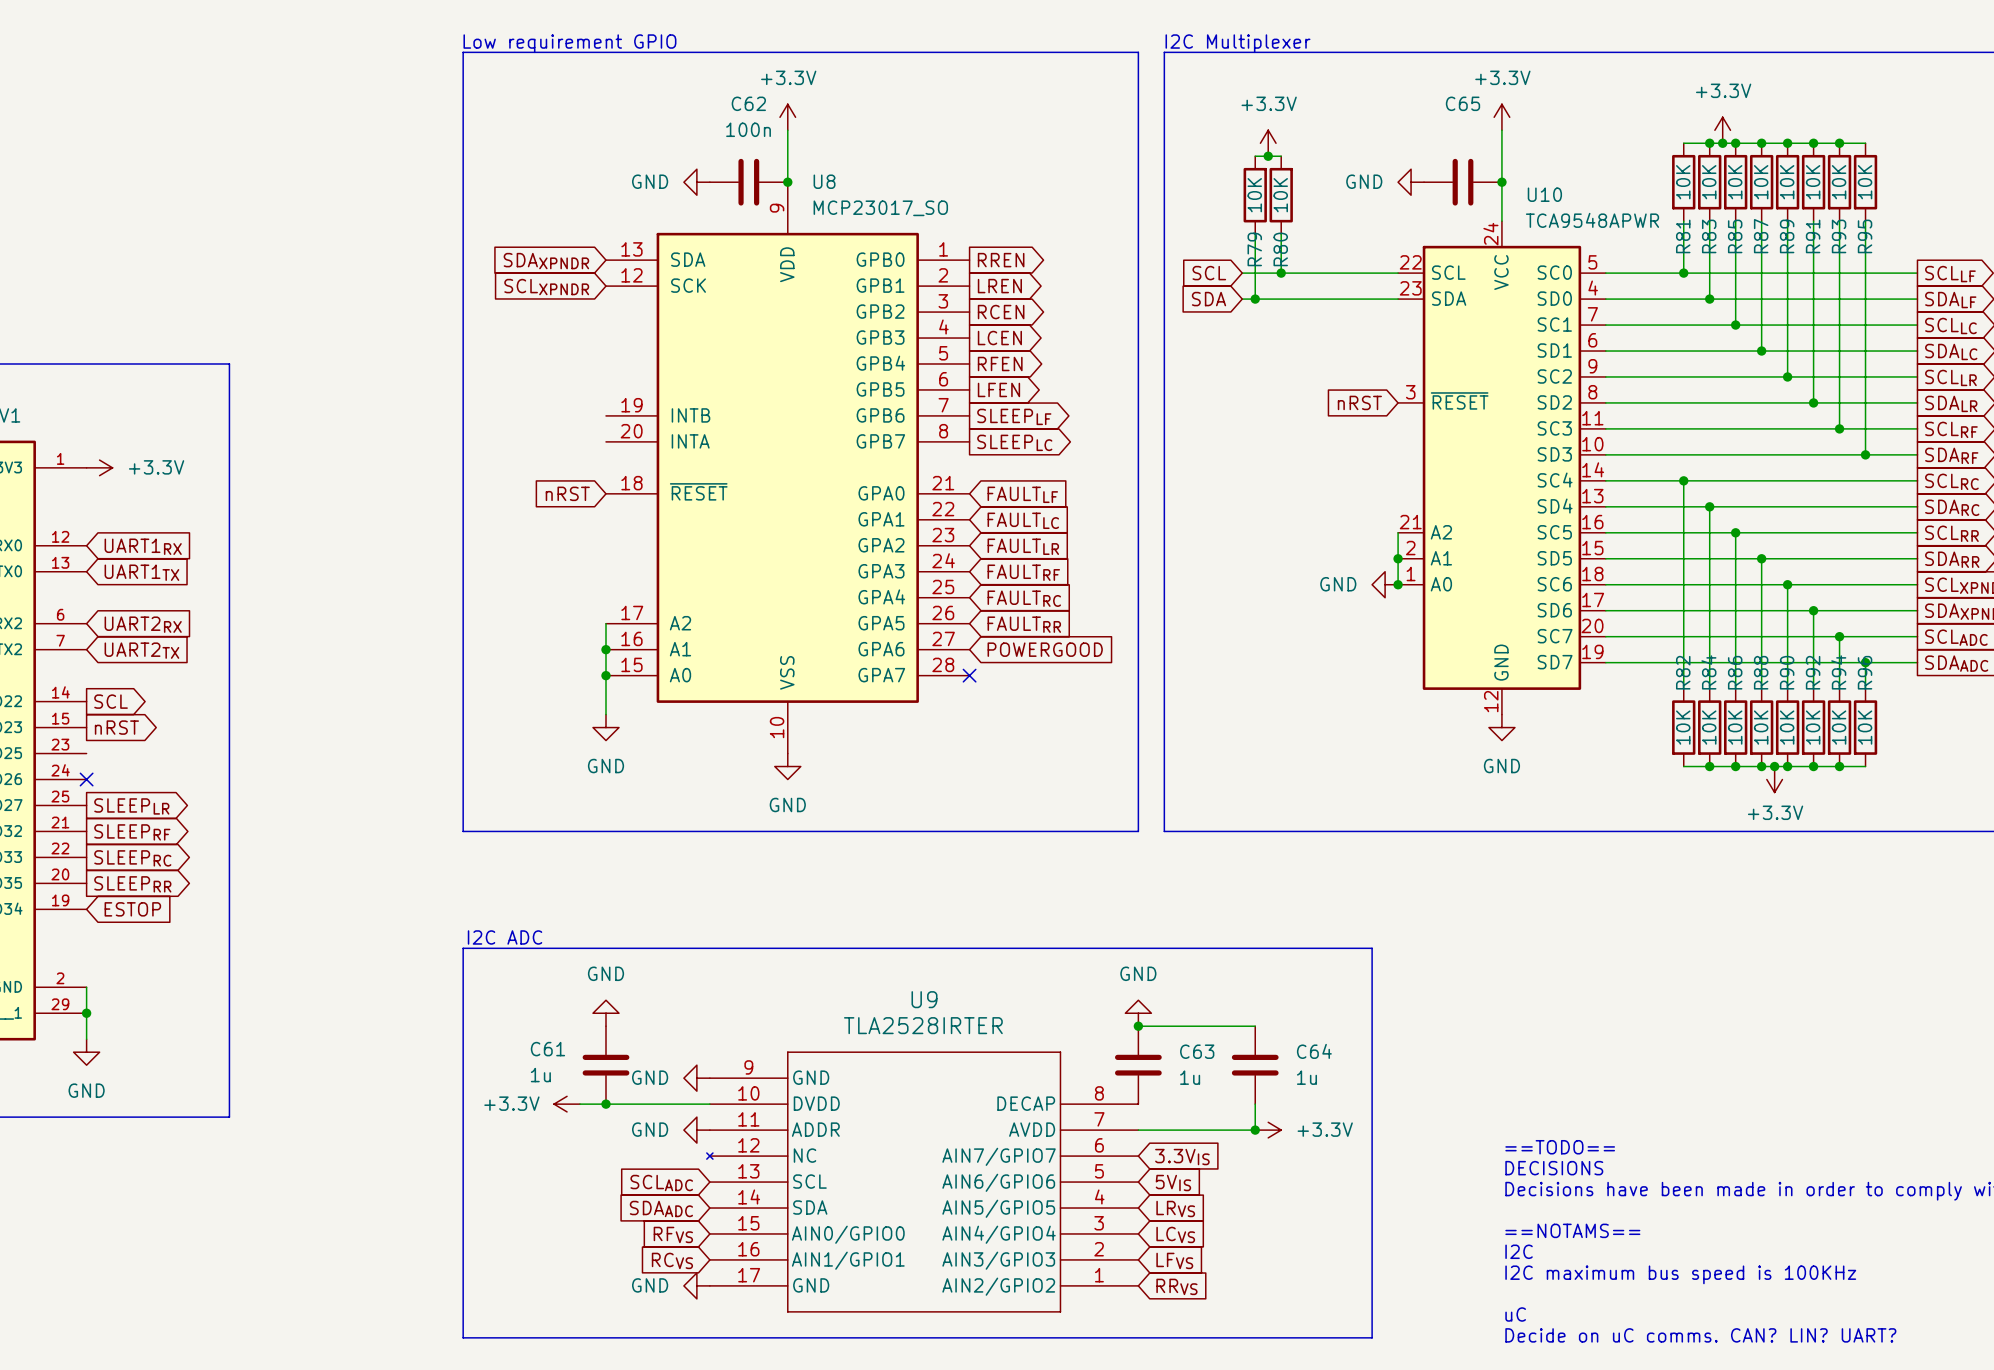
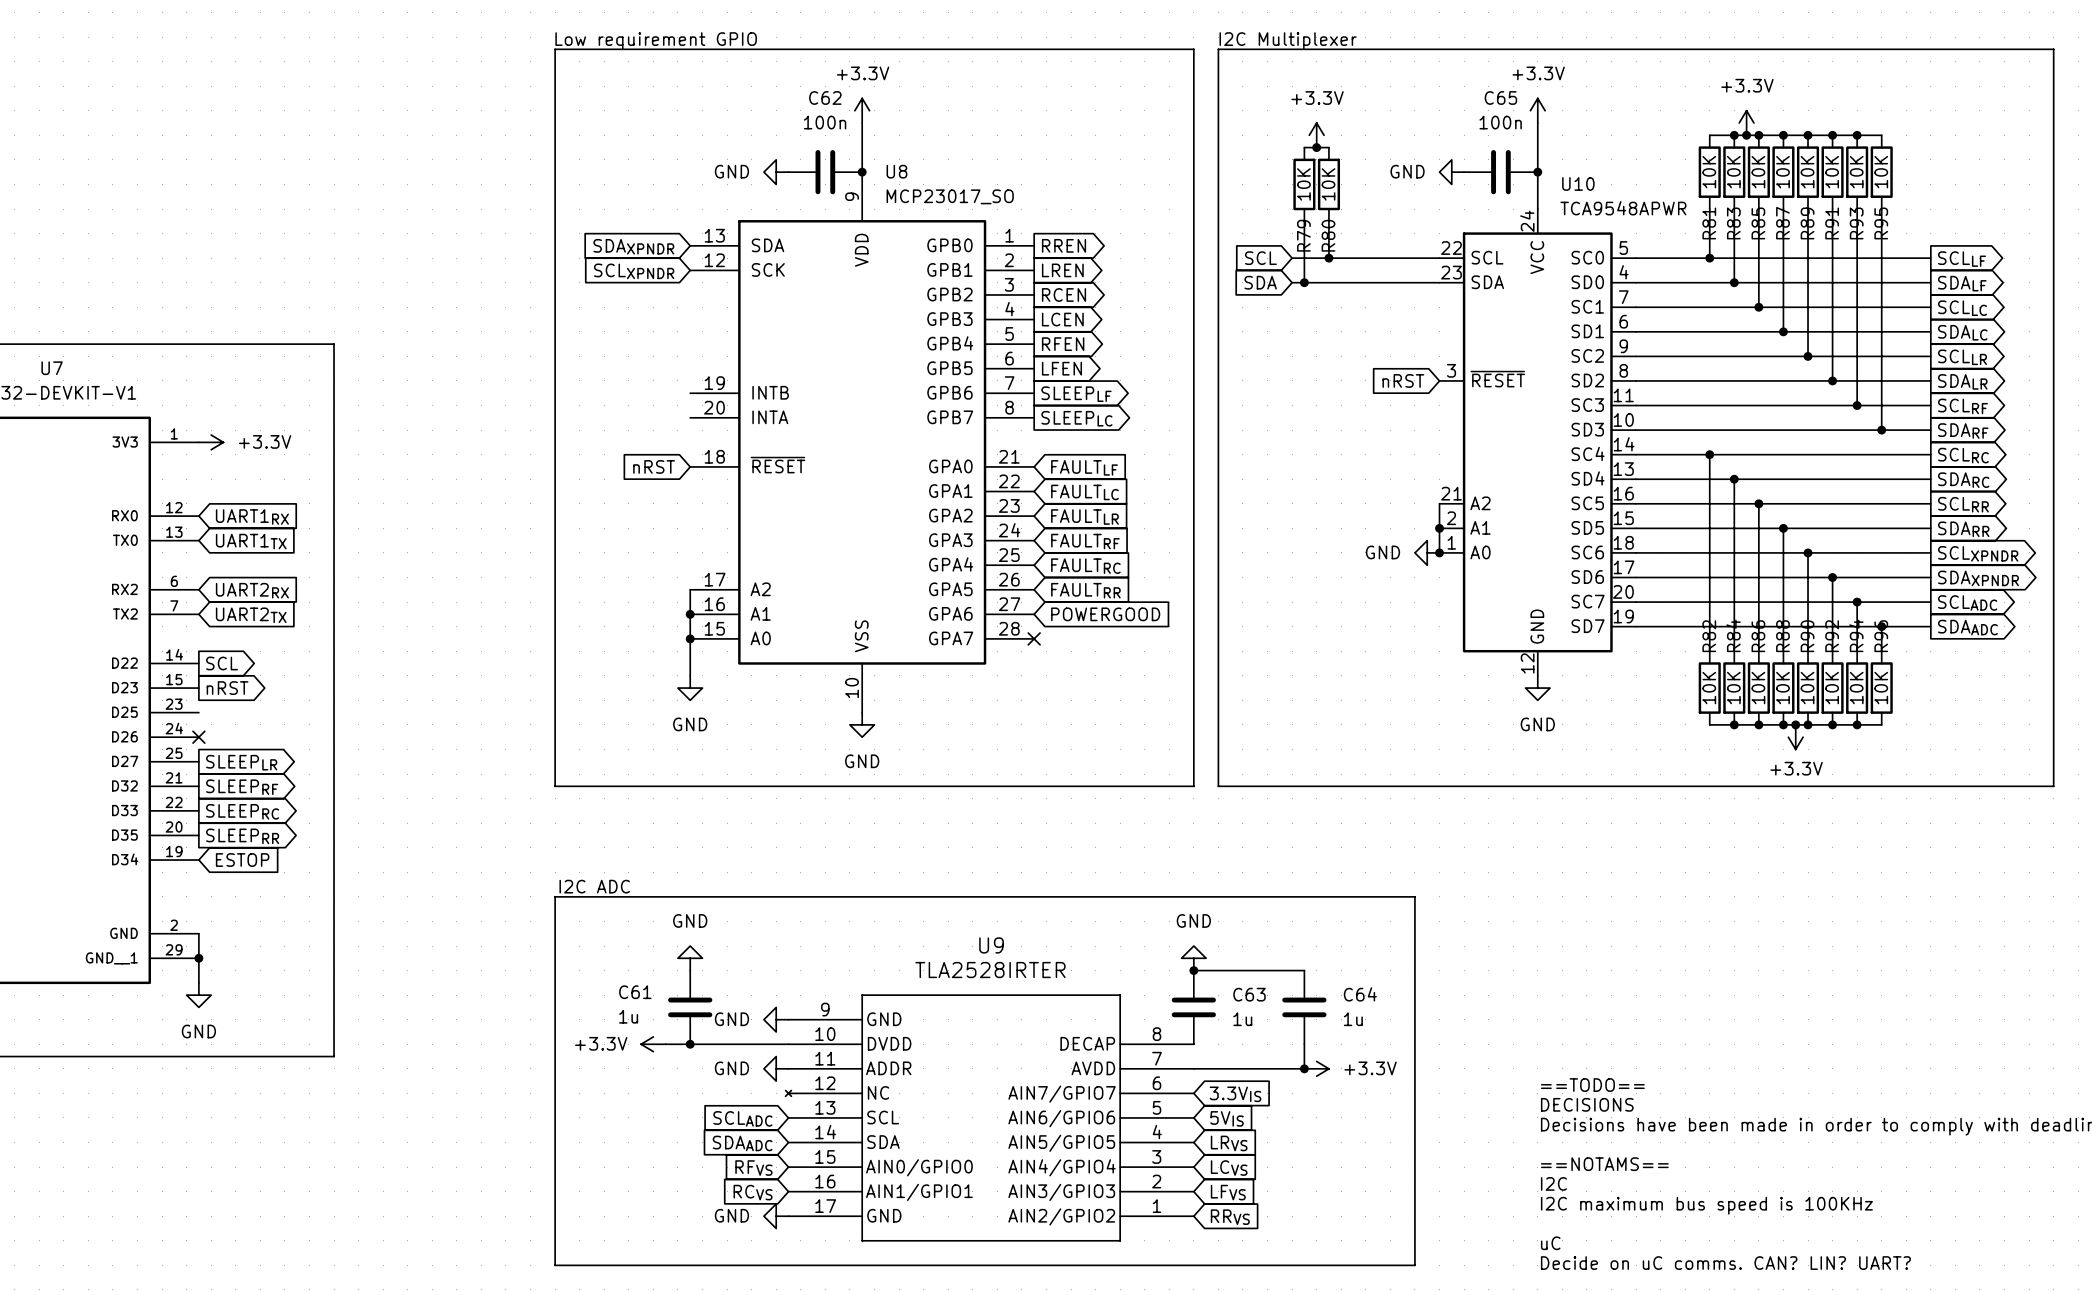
C65 value: none -> 100n (1500, 122)

